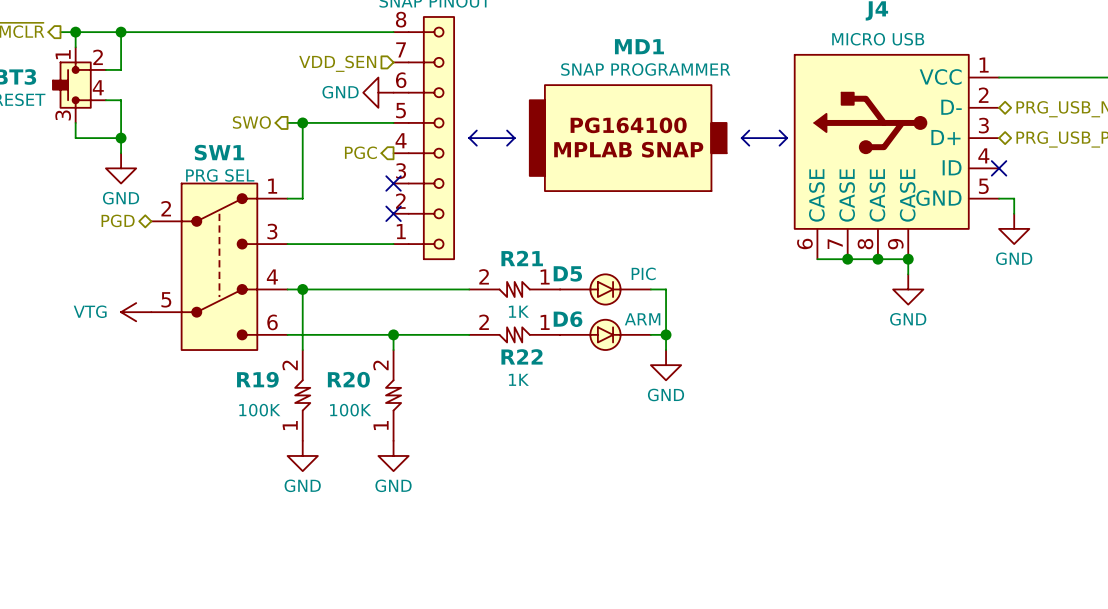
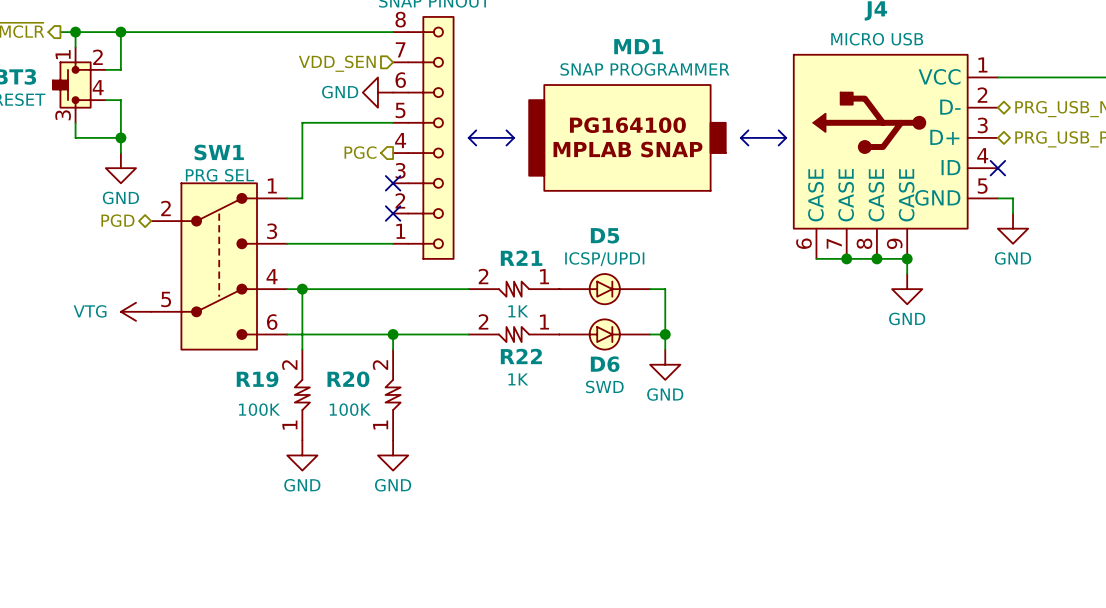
hierarchical label: SWO (251, 122) -> none
wire: (287, 122) (302, 122) -> none
junction: (302, 122) -> none
D5 name position: D5 (567, 273) -> D5 (605, 235)
D5 value: PIC (643, 273) -> ICSP/UPDI (604, 259)
D6 name position: D6 (568, 319) -> D6 (605, 364)
D6 value: ARM (642, 319) -> SWD (604, 386)

